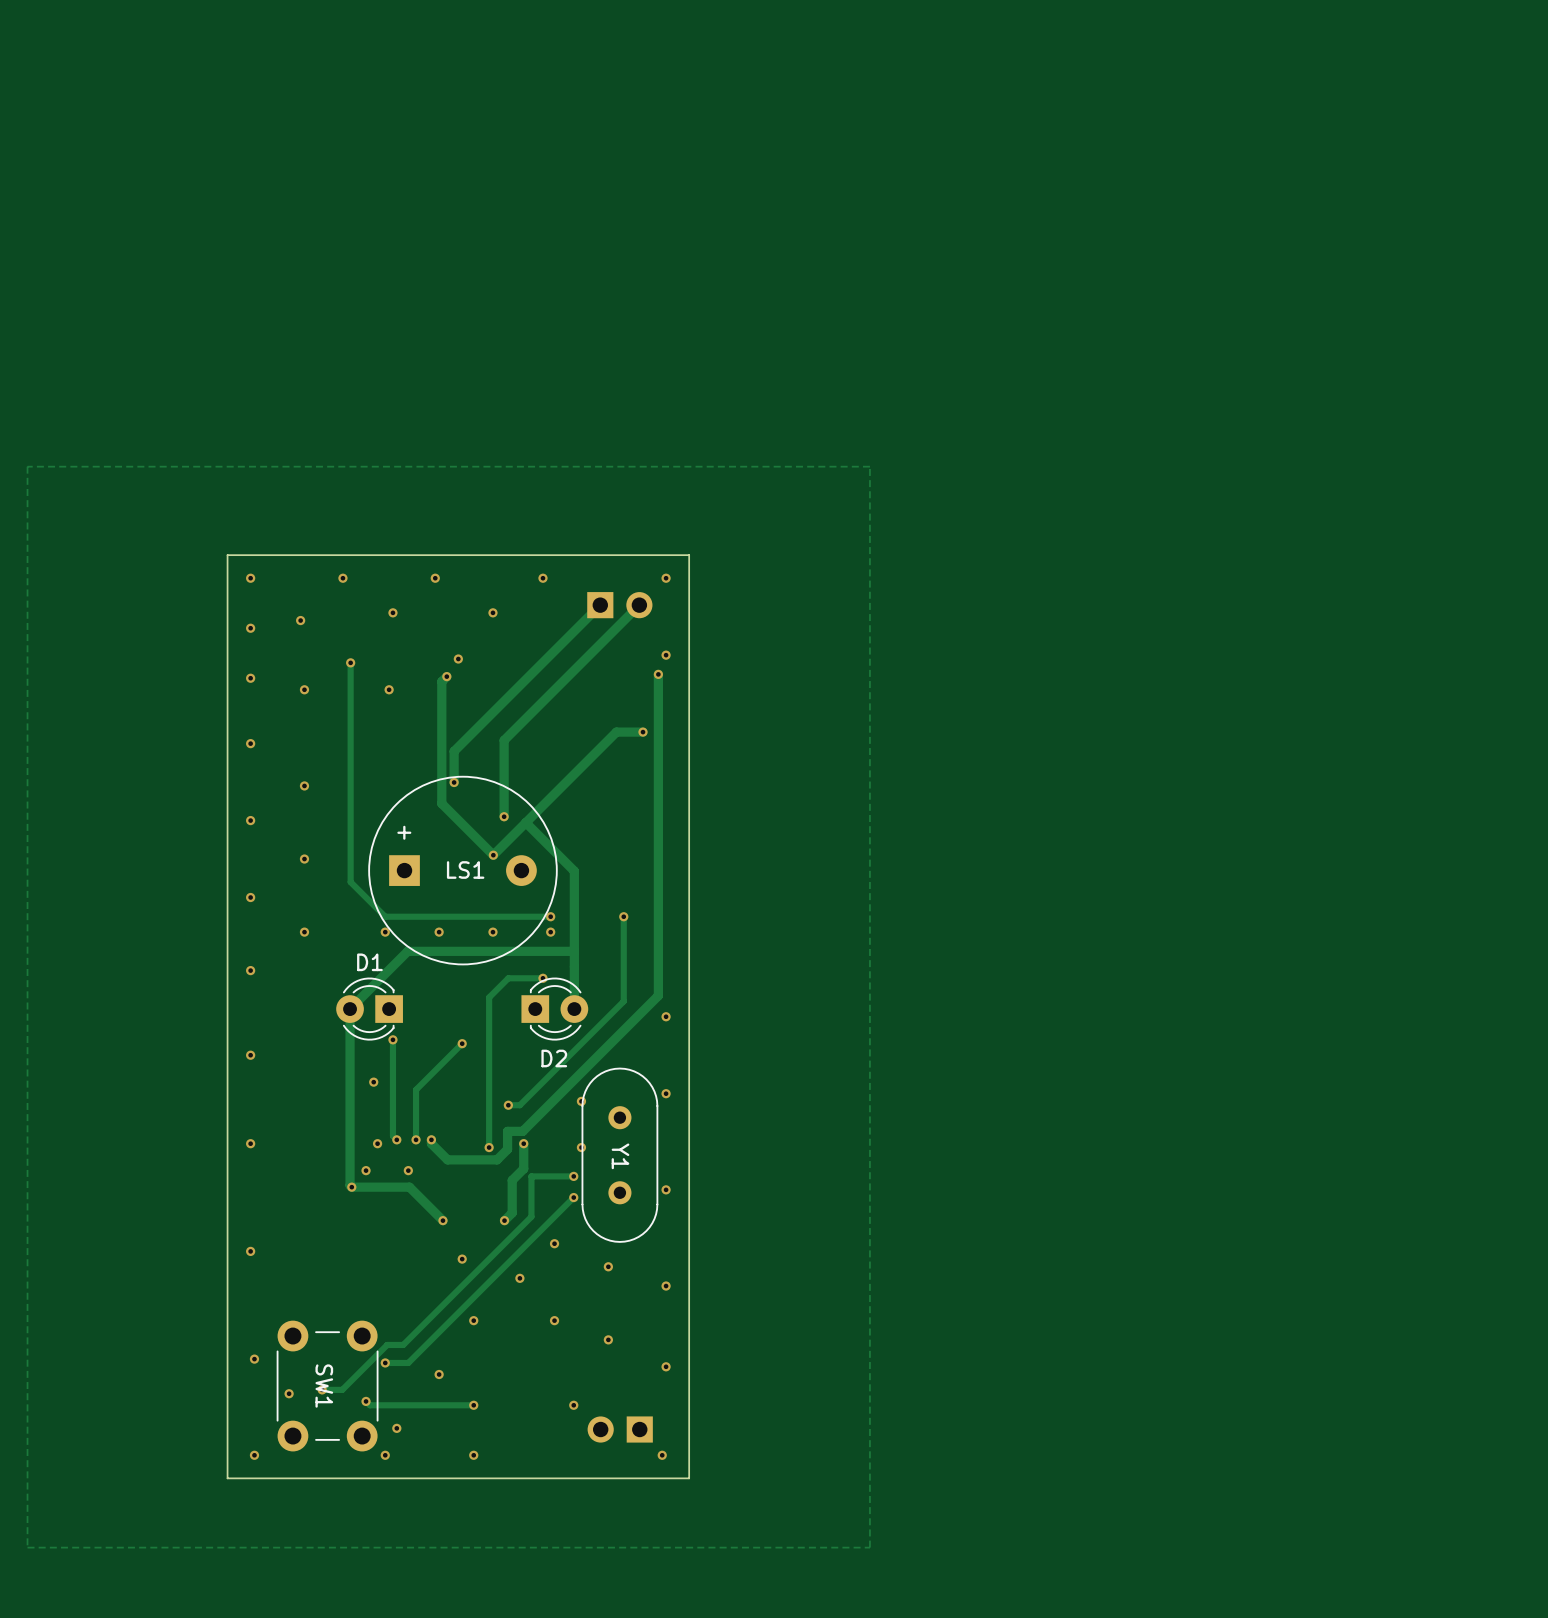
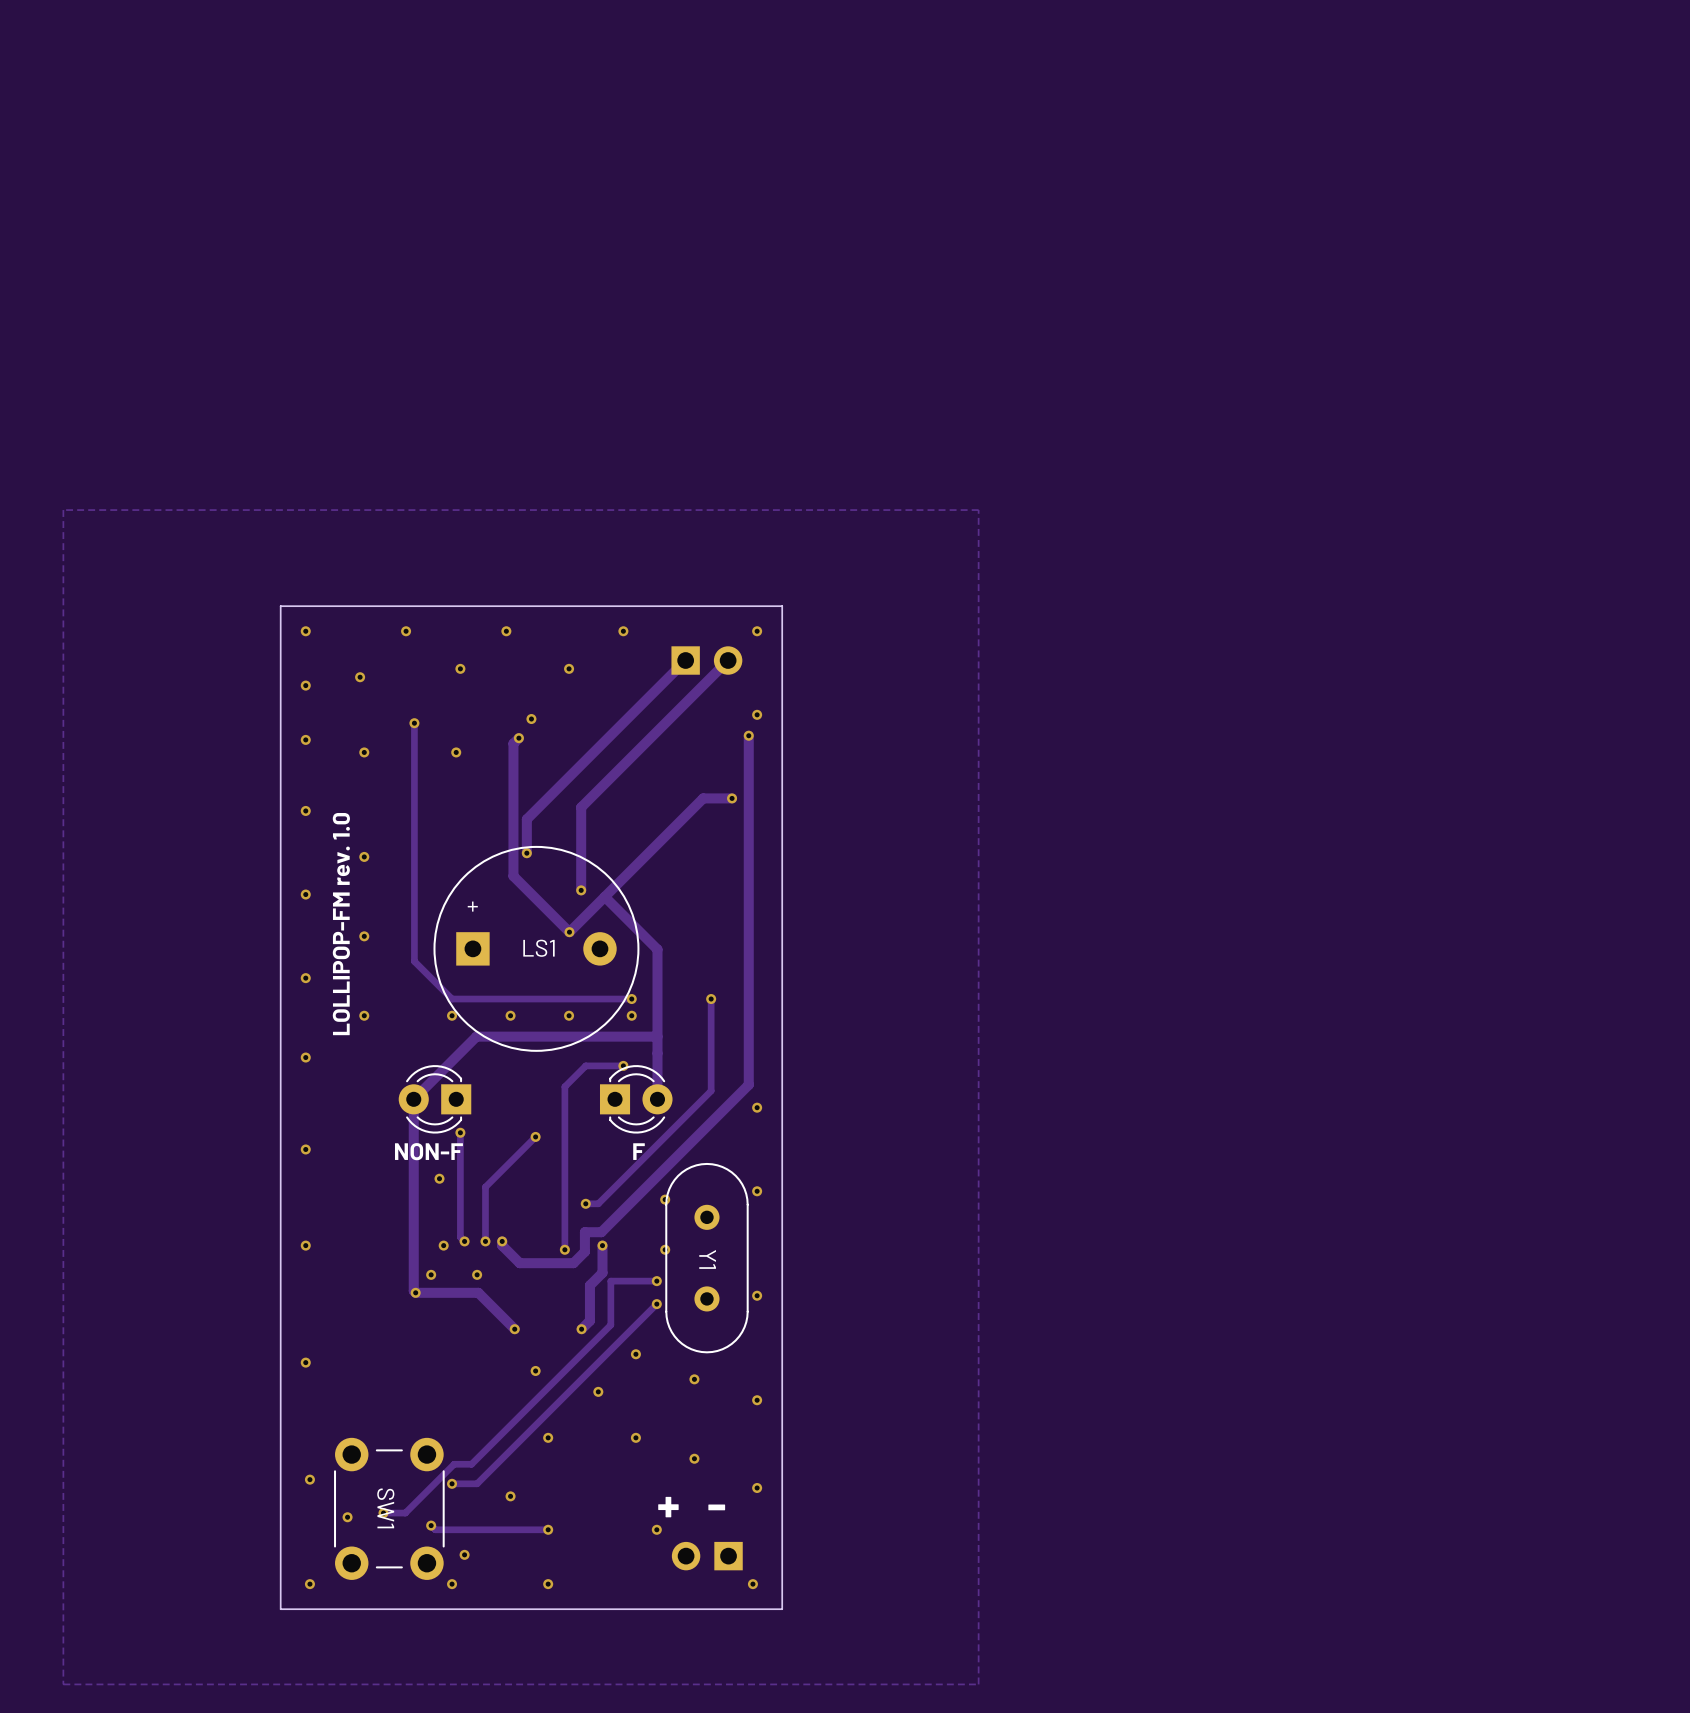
text: none -> LOLLIPOP-FM rev. 1.0 (341, 924)
D1 name: D1 (369, 962) -> none
text: none -> NON-F (428, 1151)
text: none -> F (638, 1151)
D2 name: D2 (554, 1058) -> none
text: none -> + (668, 1507)
text: none -> - (716, 1507)

